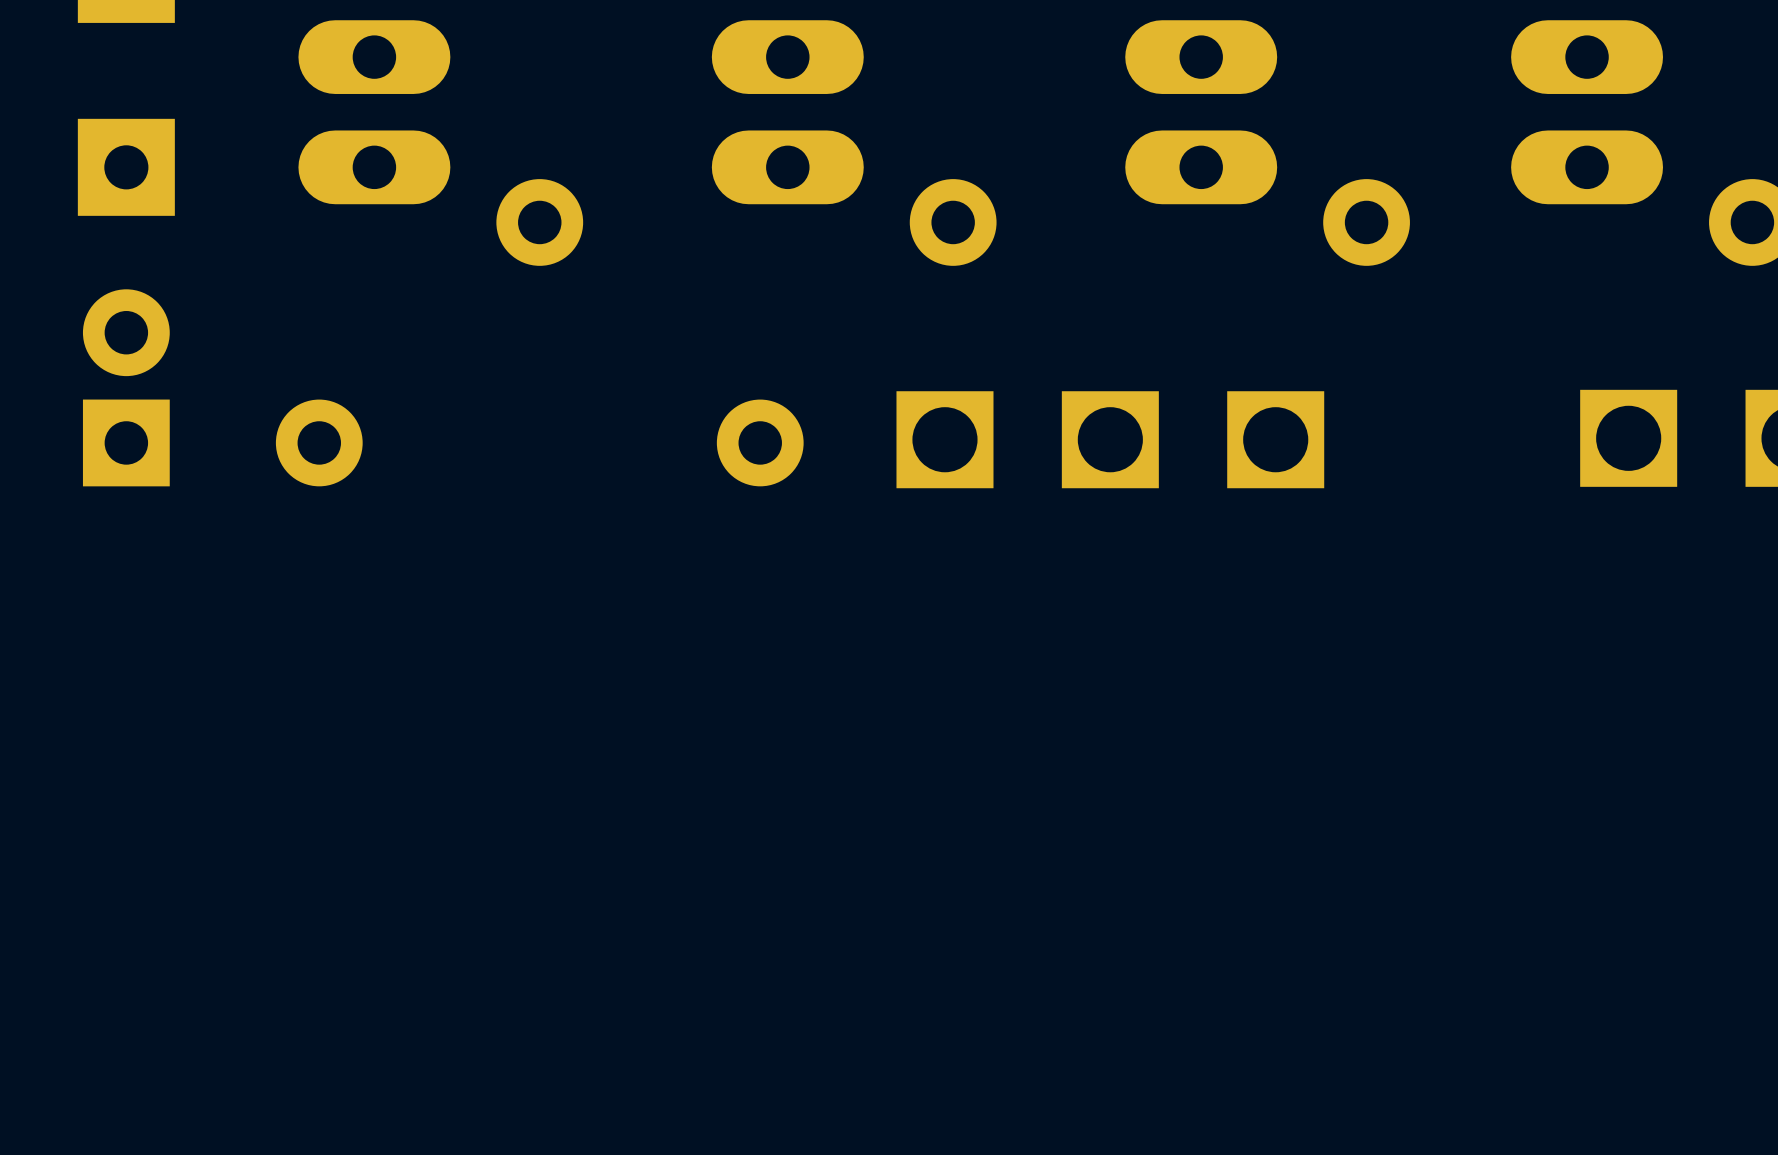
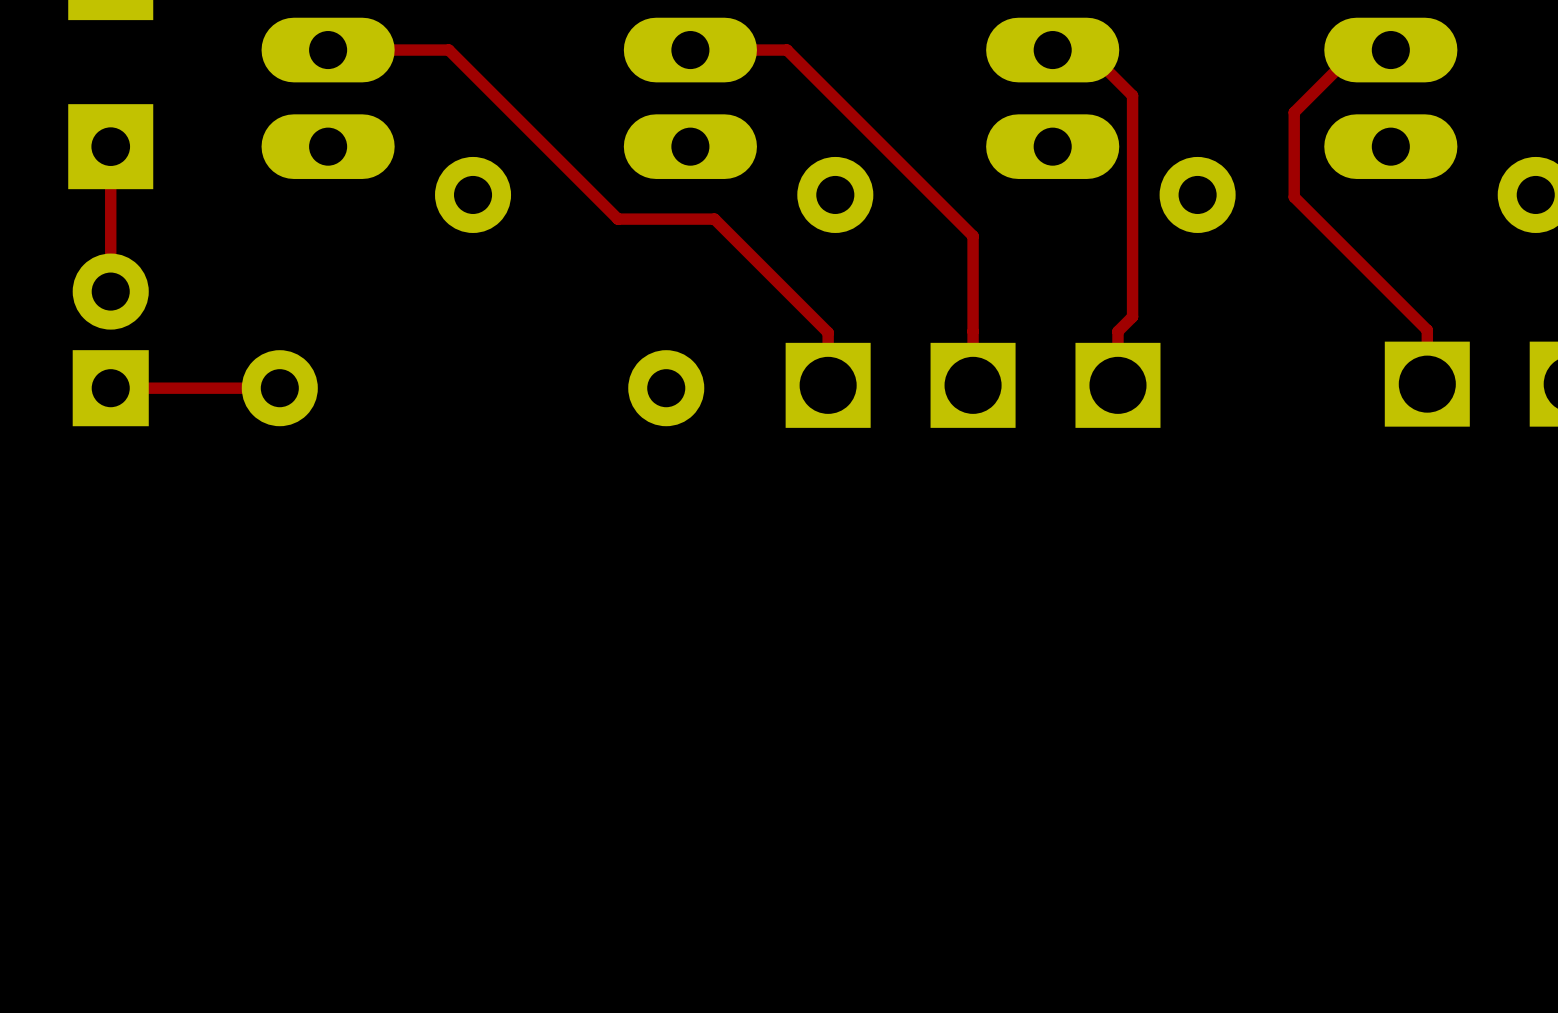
top track: none -> (328, 50) (448, 50) (617, 219) (714, 219) (828, 332) (828, 385)
top track: none -> (690, 50) (787, 50) (973, 236) (973, 385)
top track: none -> (1052, 50) (1086, 50) (1132, 95) (1132, 316) (1117, 331) (1117, 385)
top track: none -> (1390, 50) (1356, 50) (1294, 112) (1294, 197) (1427, 330) (1427, 384)
top track: none -> (110, 146) (110, 291)
top track: none -> (279, 388) (110, 388)

